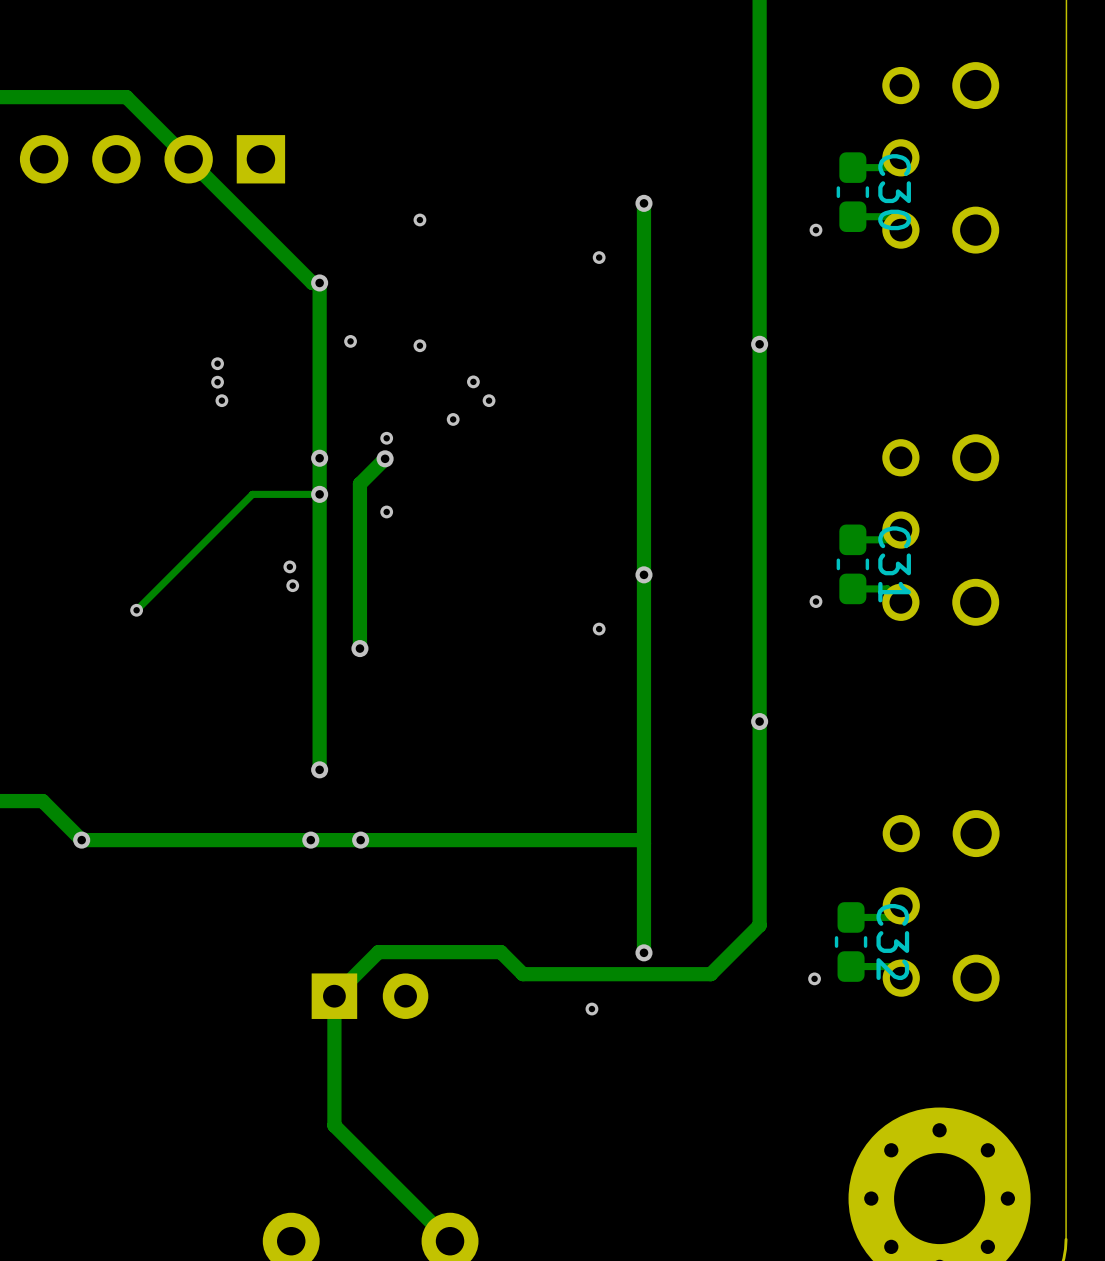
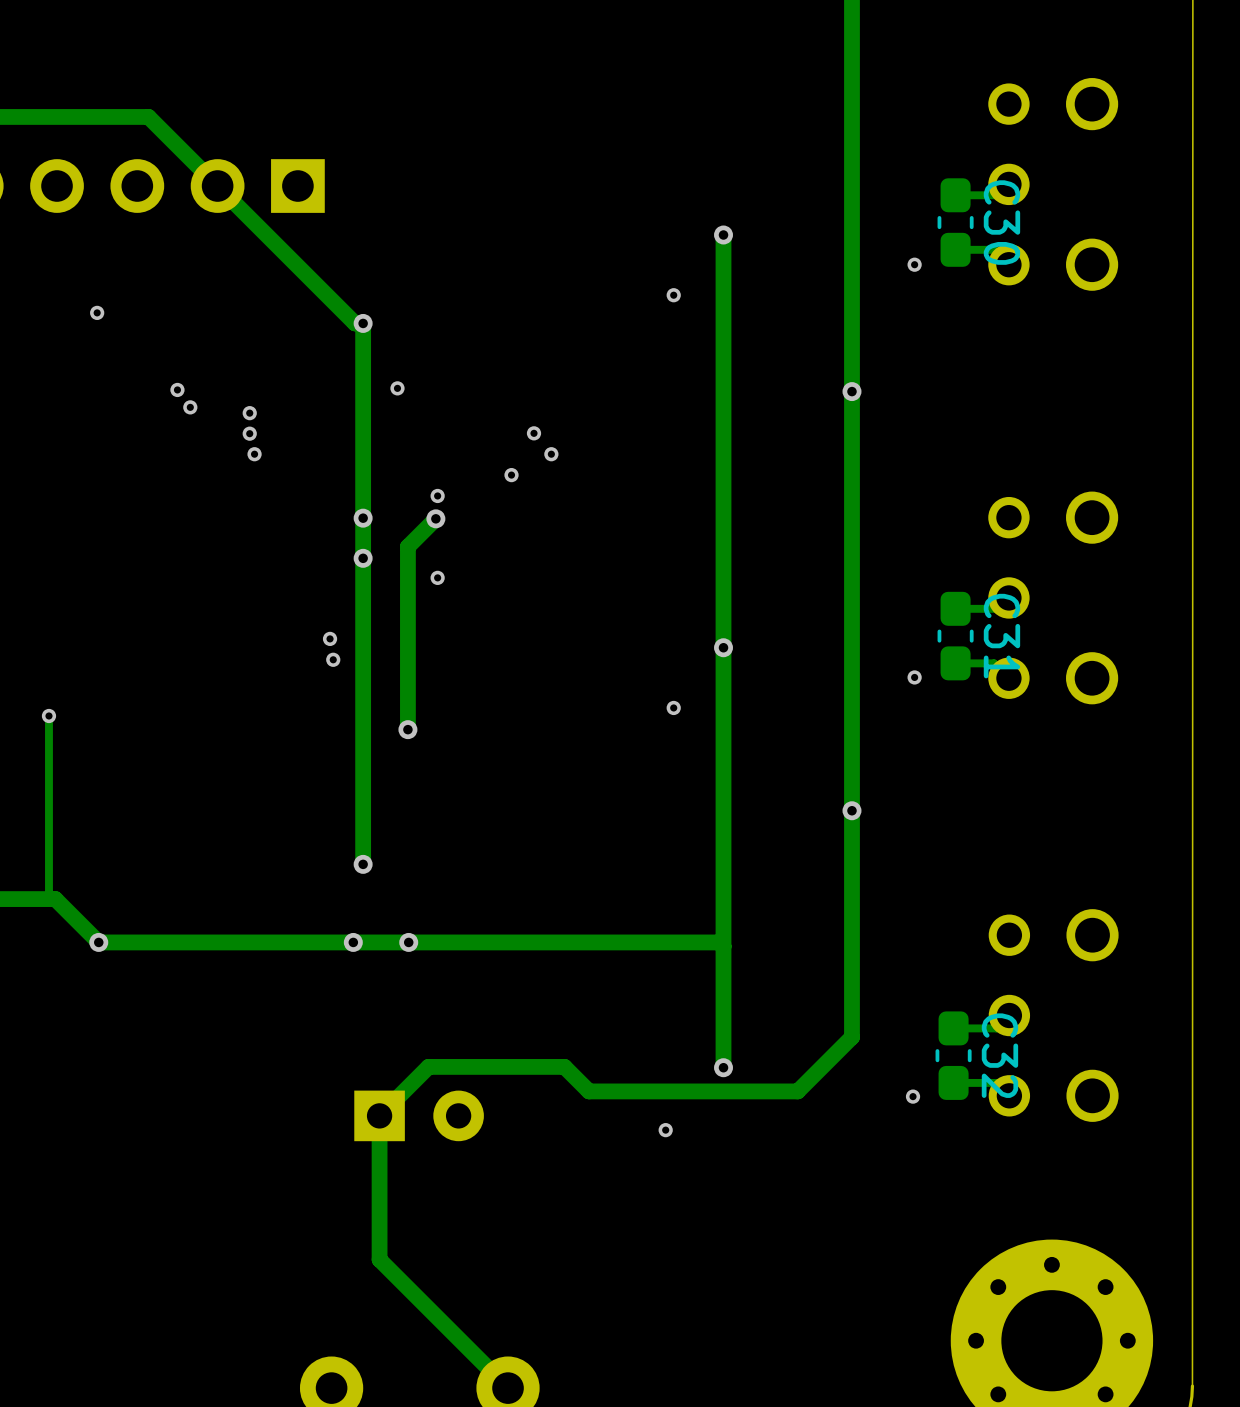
via: (419, 219) -> none
via: none -> (97, 312)
via: none -> (177, 389)
via: (419, 345) -> none
via: none -> (190, 407)
track: (319, 494) (252, 494) (136, 610) -> none
via position: (136, 610) -> (48, 715)
track: none -> (48, 715) (48, 892) (55, 899)

